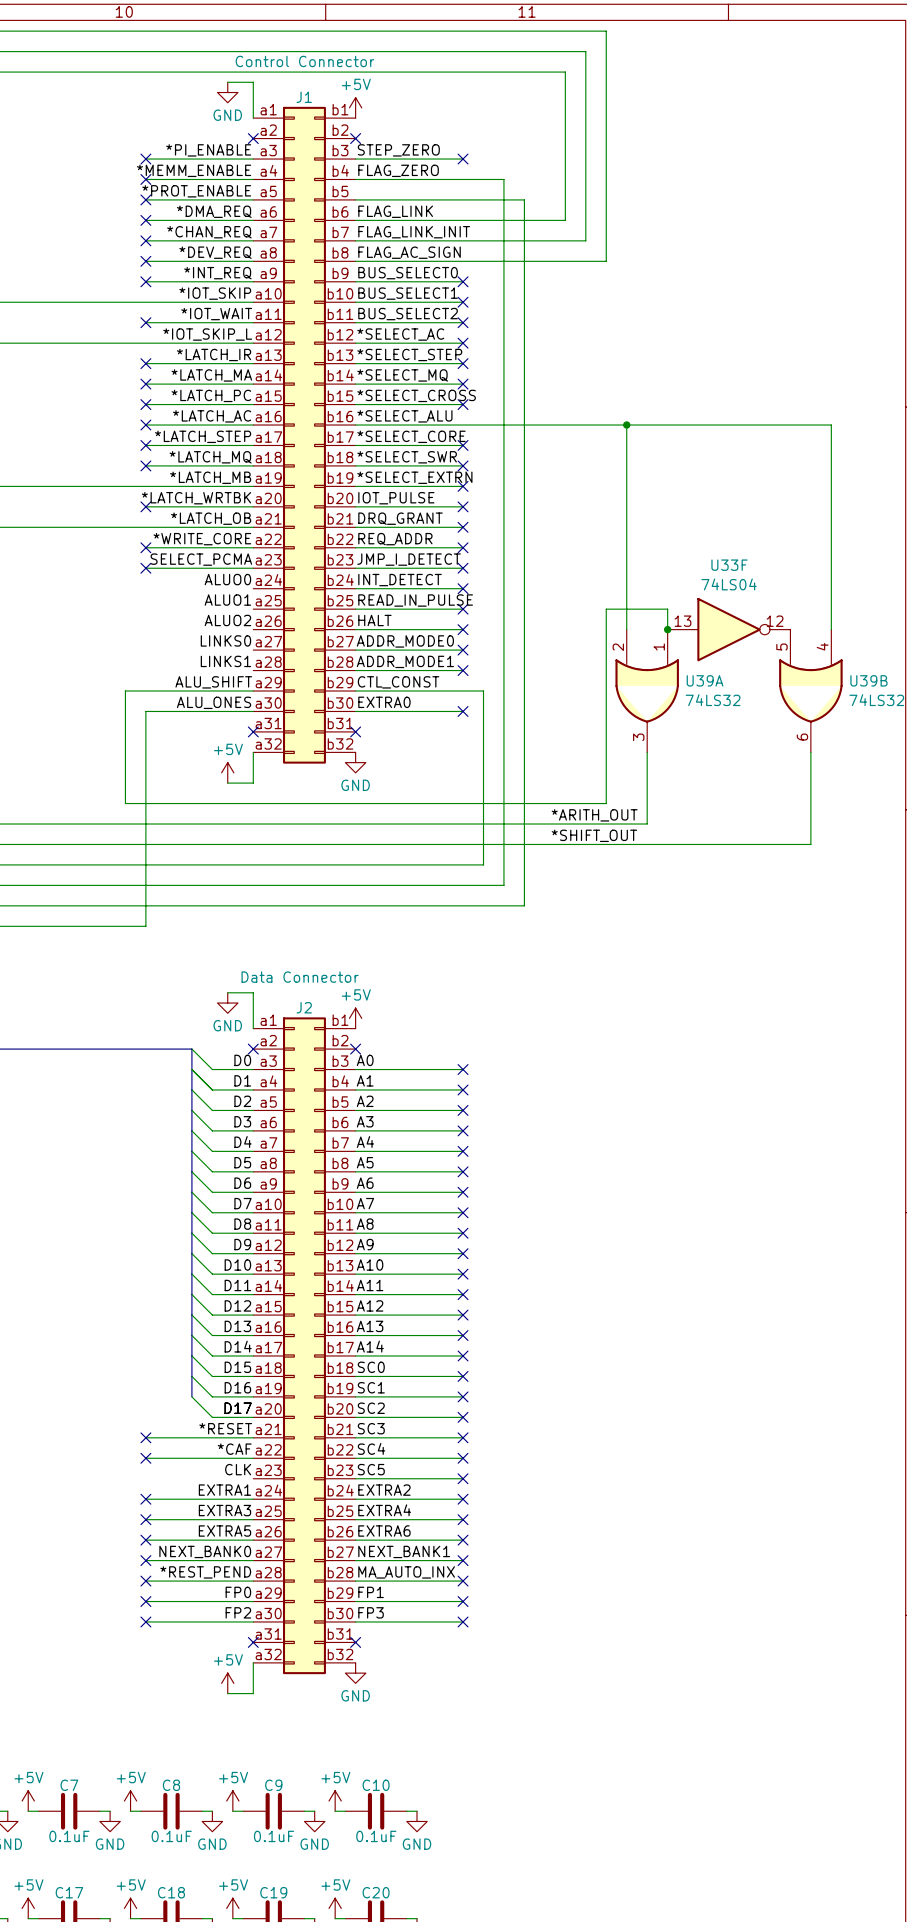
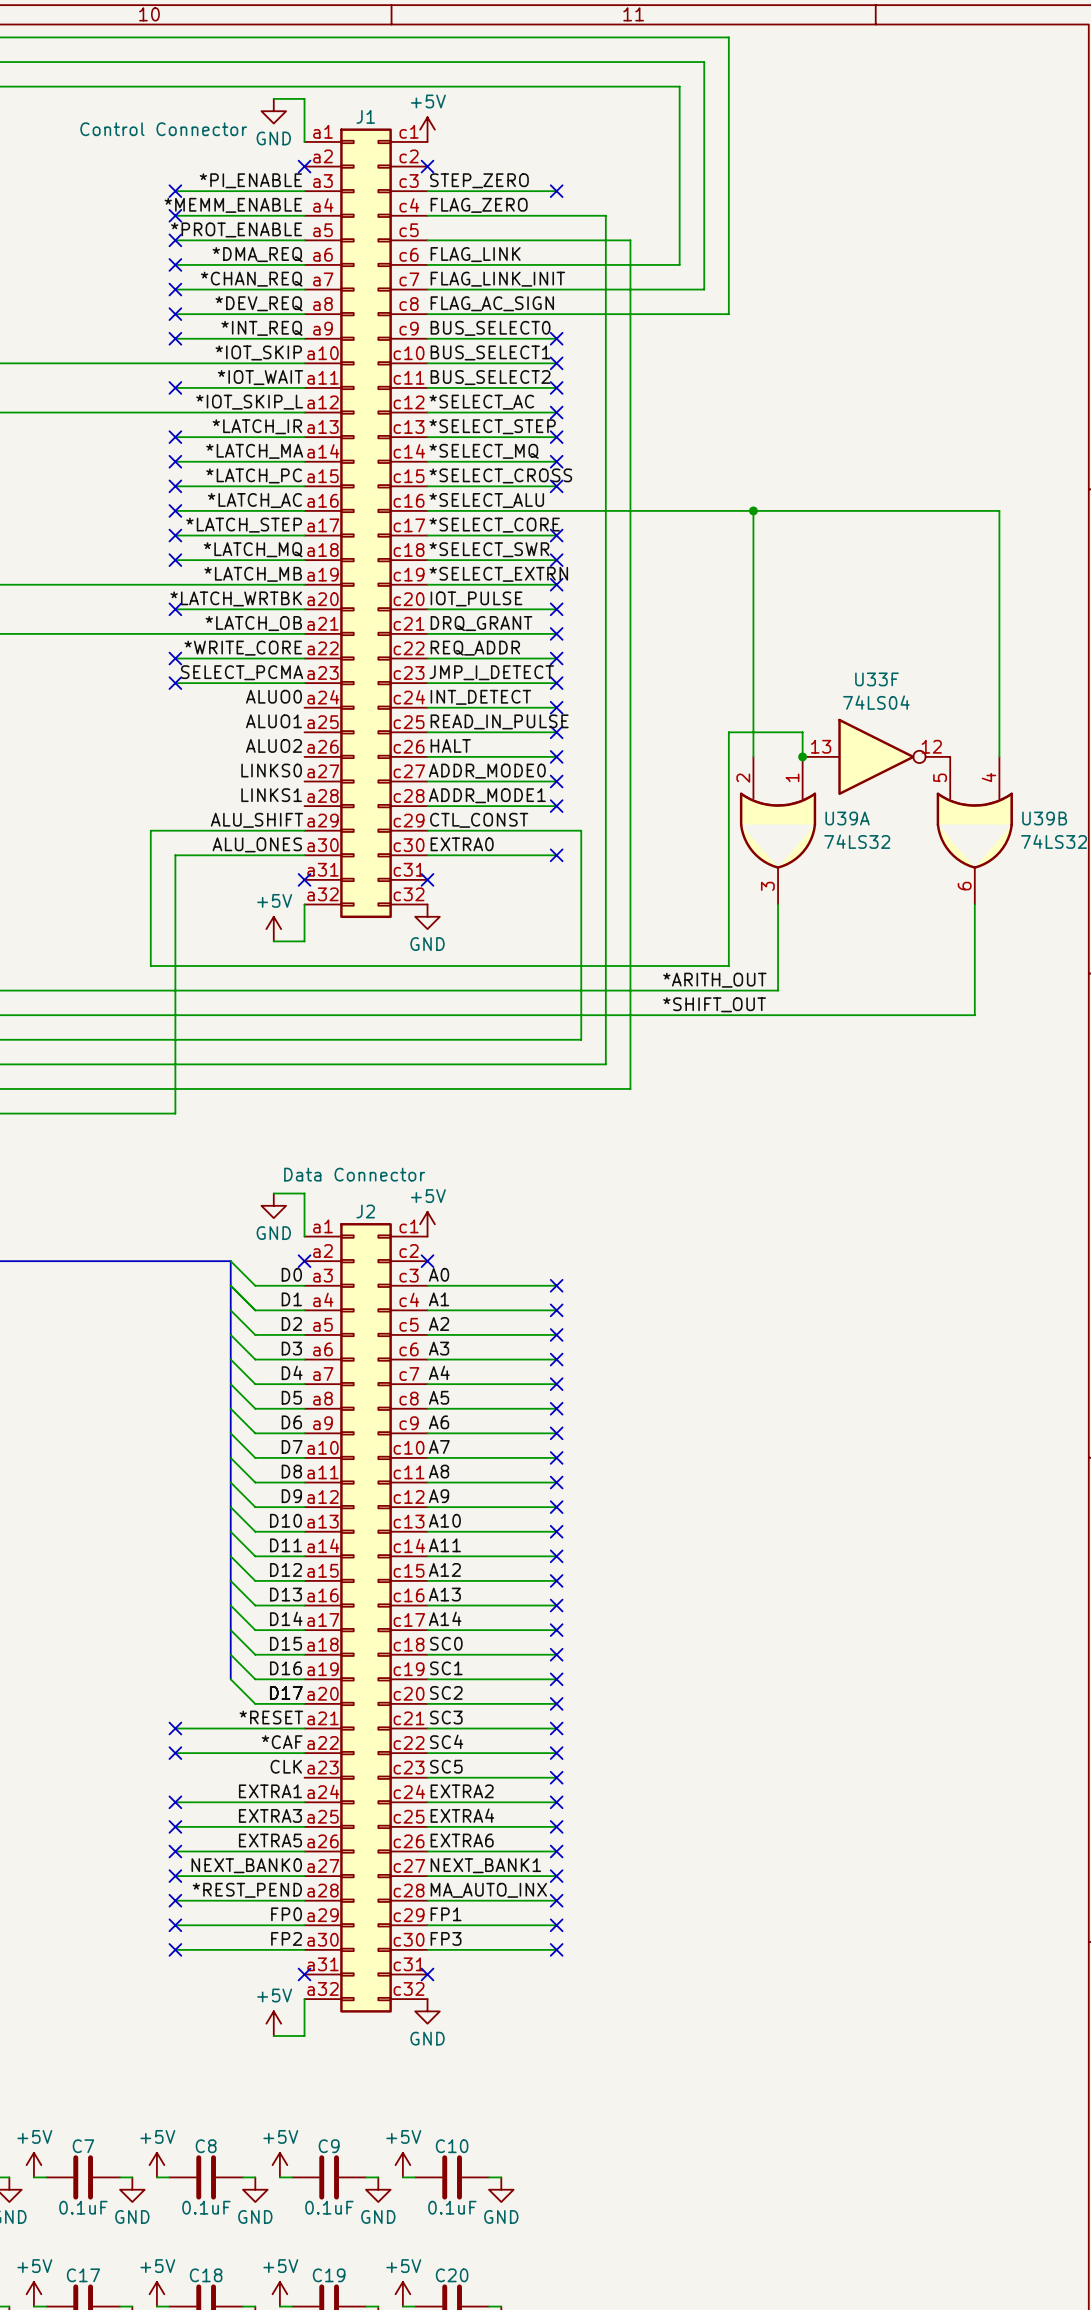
J1 value position: Control Connector (304, 61) -> Control Connector (163, 129)
J1 symbol: [253, 106, 356, 764] -> [304, 128, 428, 919]
J2 symbol: [253, 1017, 356, 1675] -> [304, 1223, 428, 2013]

